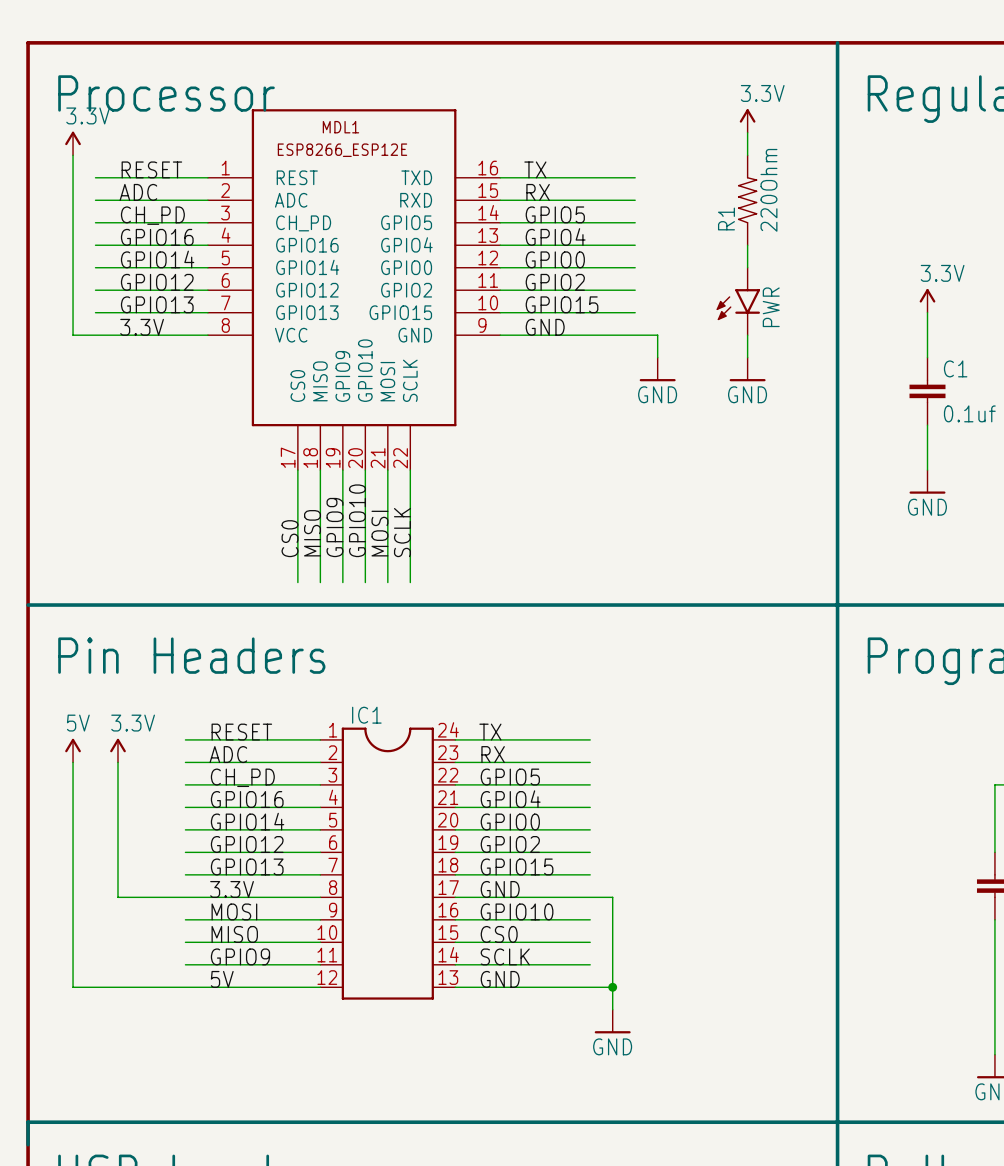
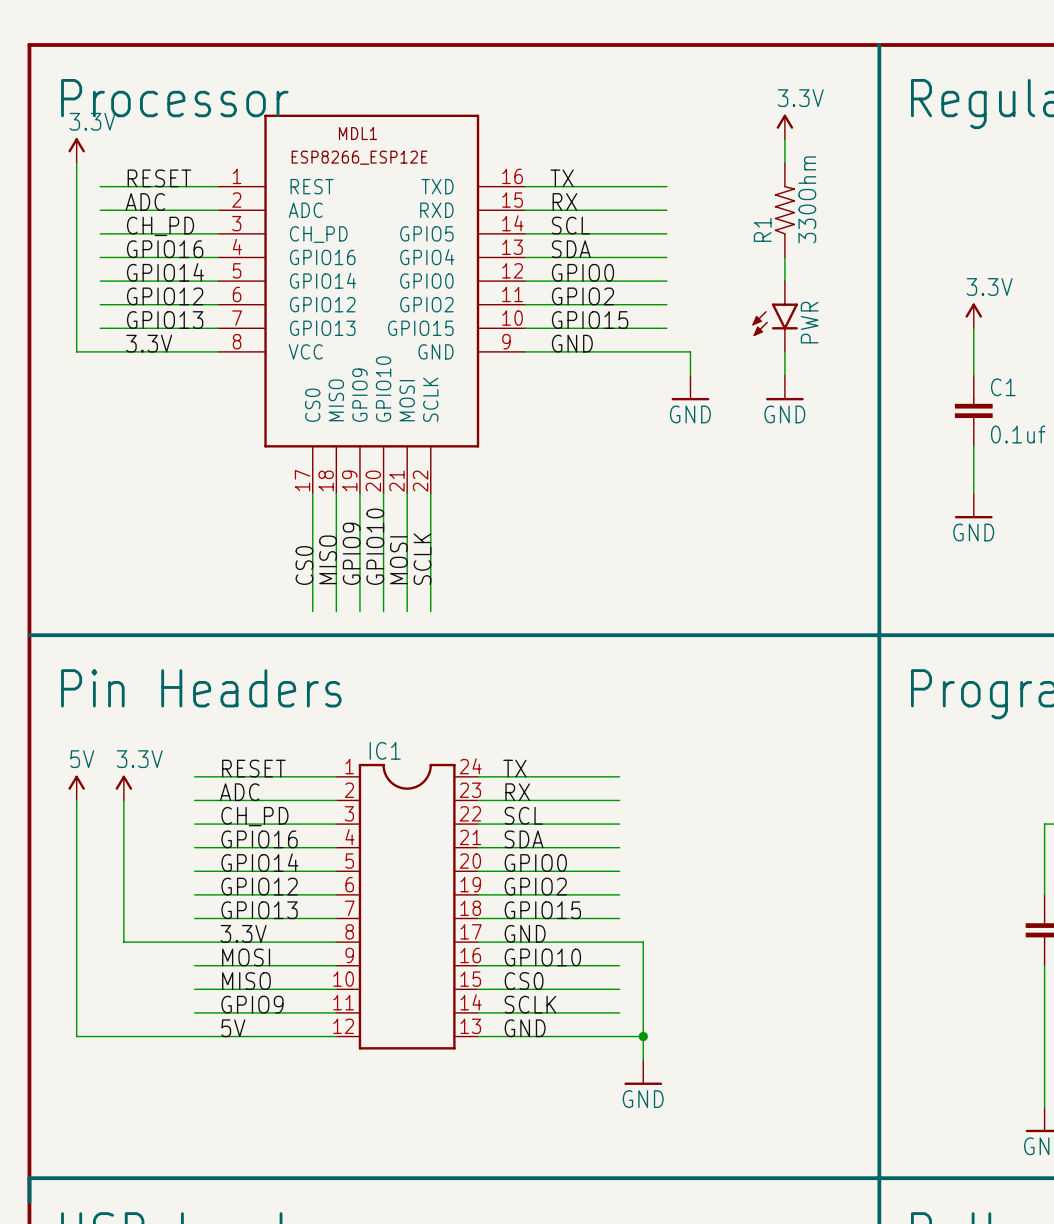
R1 value: 220Ohm (768, 190) -> 330Ohm (807, 199)
label: GPIO5 (555, 214) -> SCL (570, 225)
label: GPIO4 (555, 236) -> SDA (571, 249)
label: GPIO5 (510, 777) -> SCL (523, 815)
label: GPIO4 (510, 799) -> SDA (524, 839)

